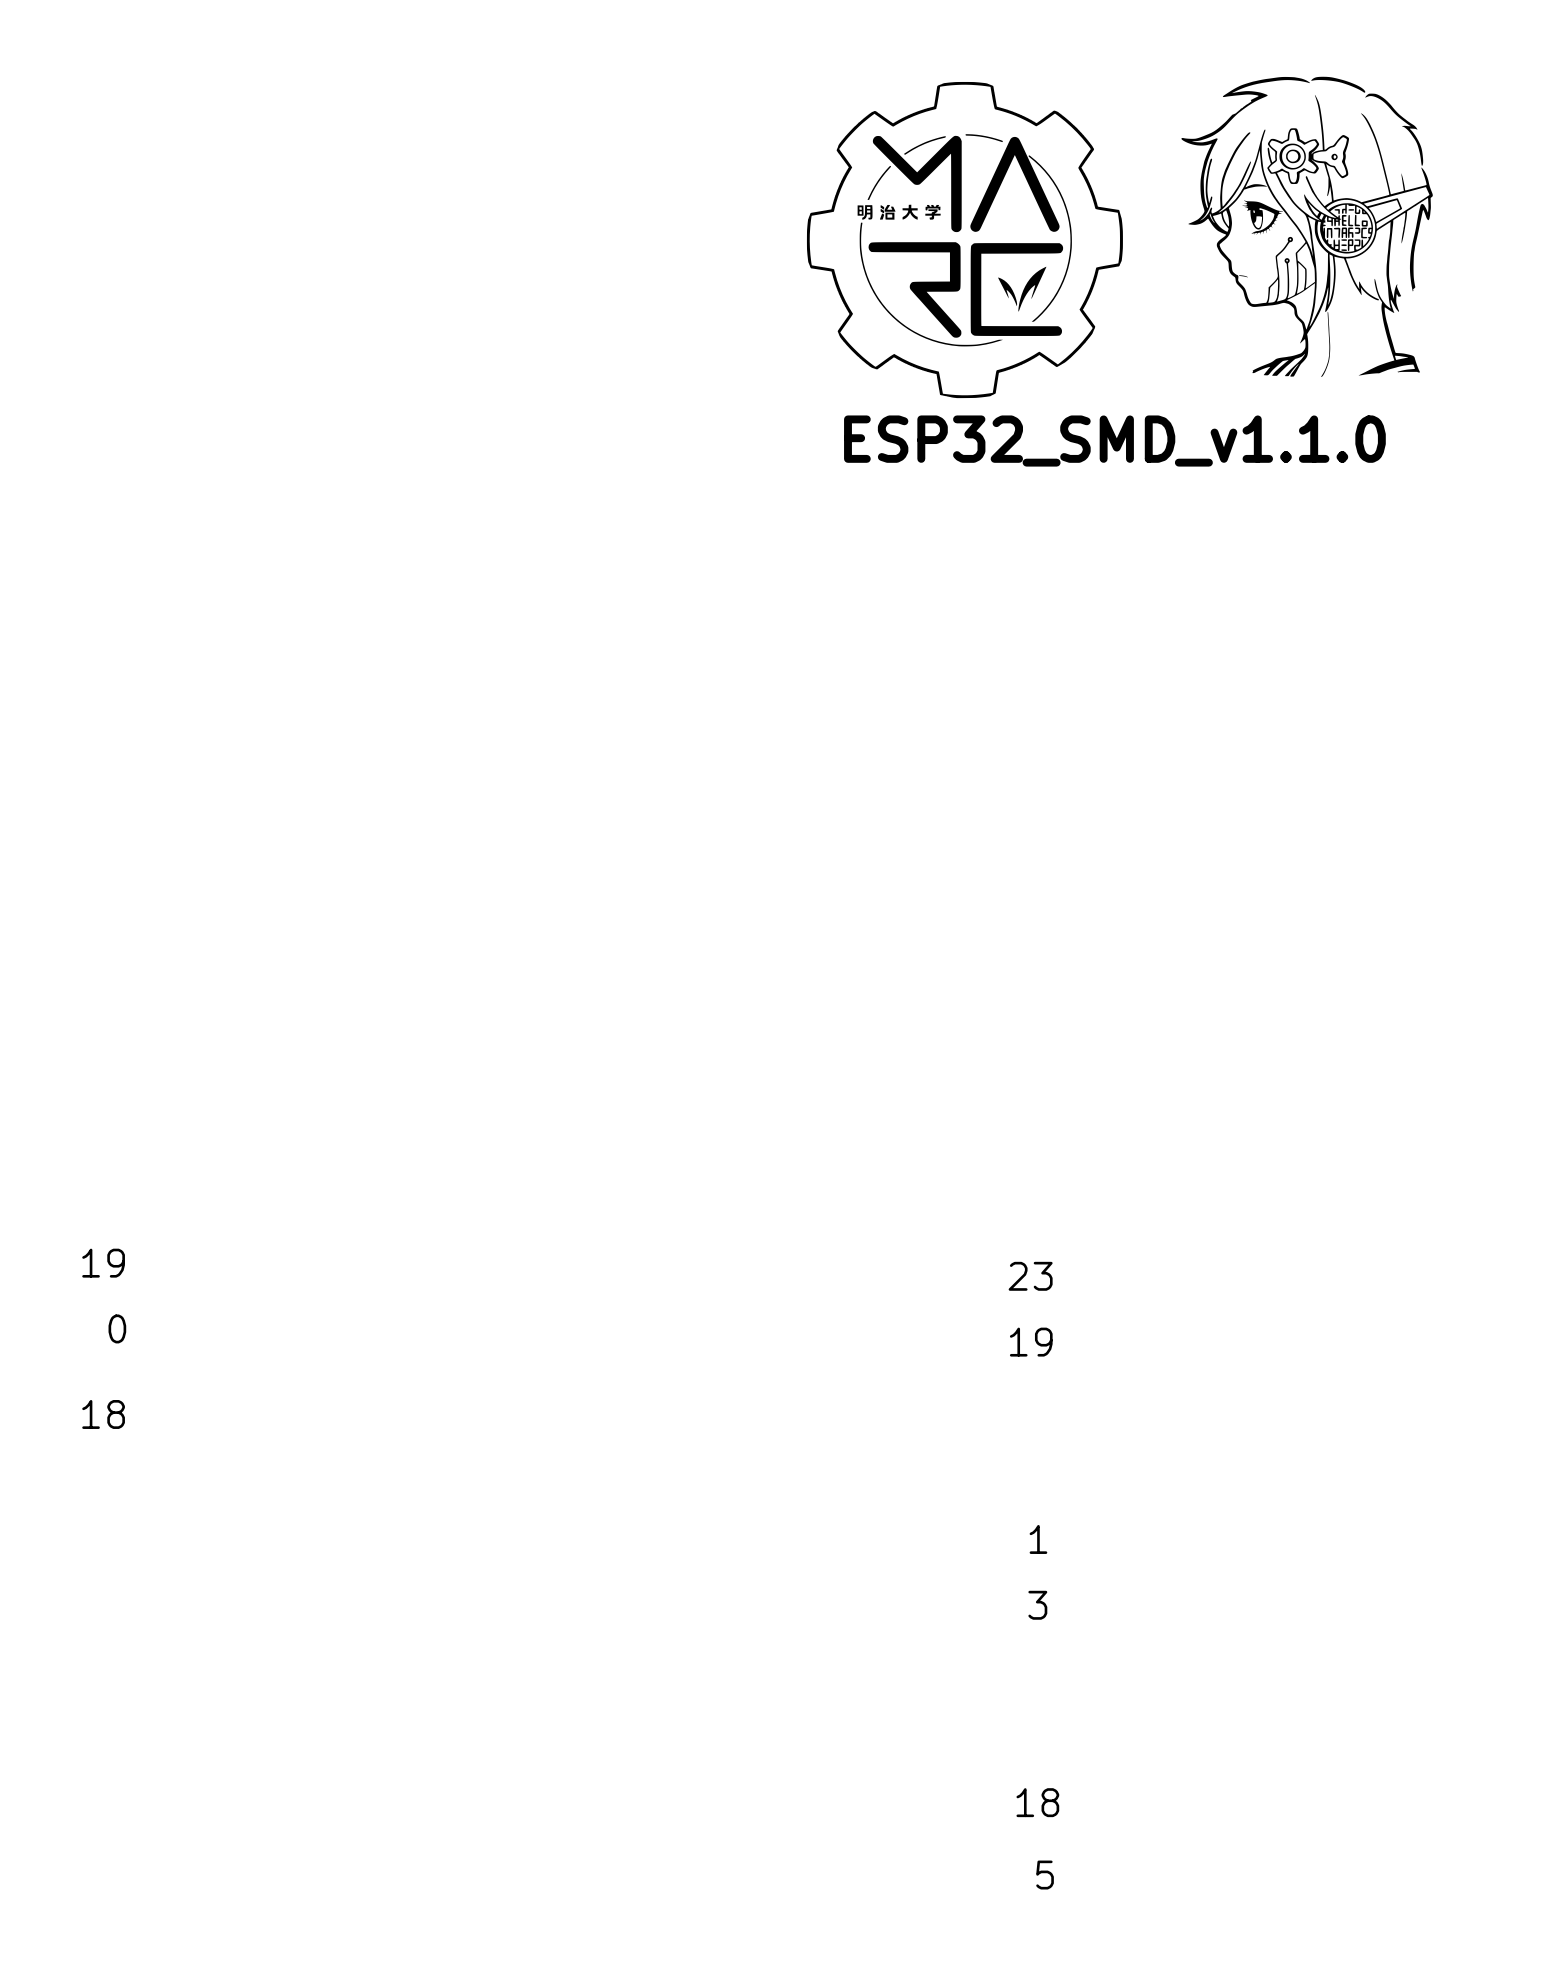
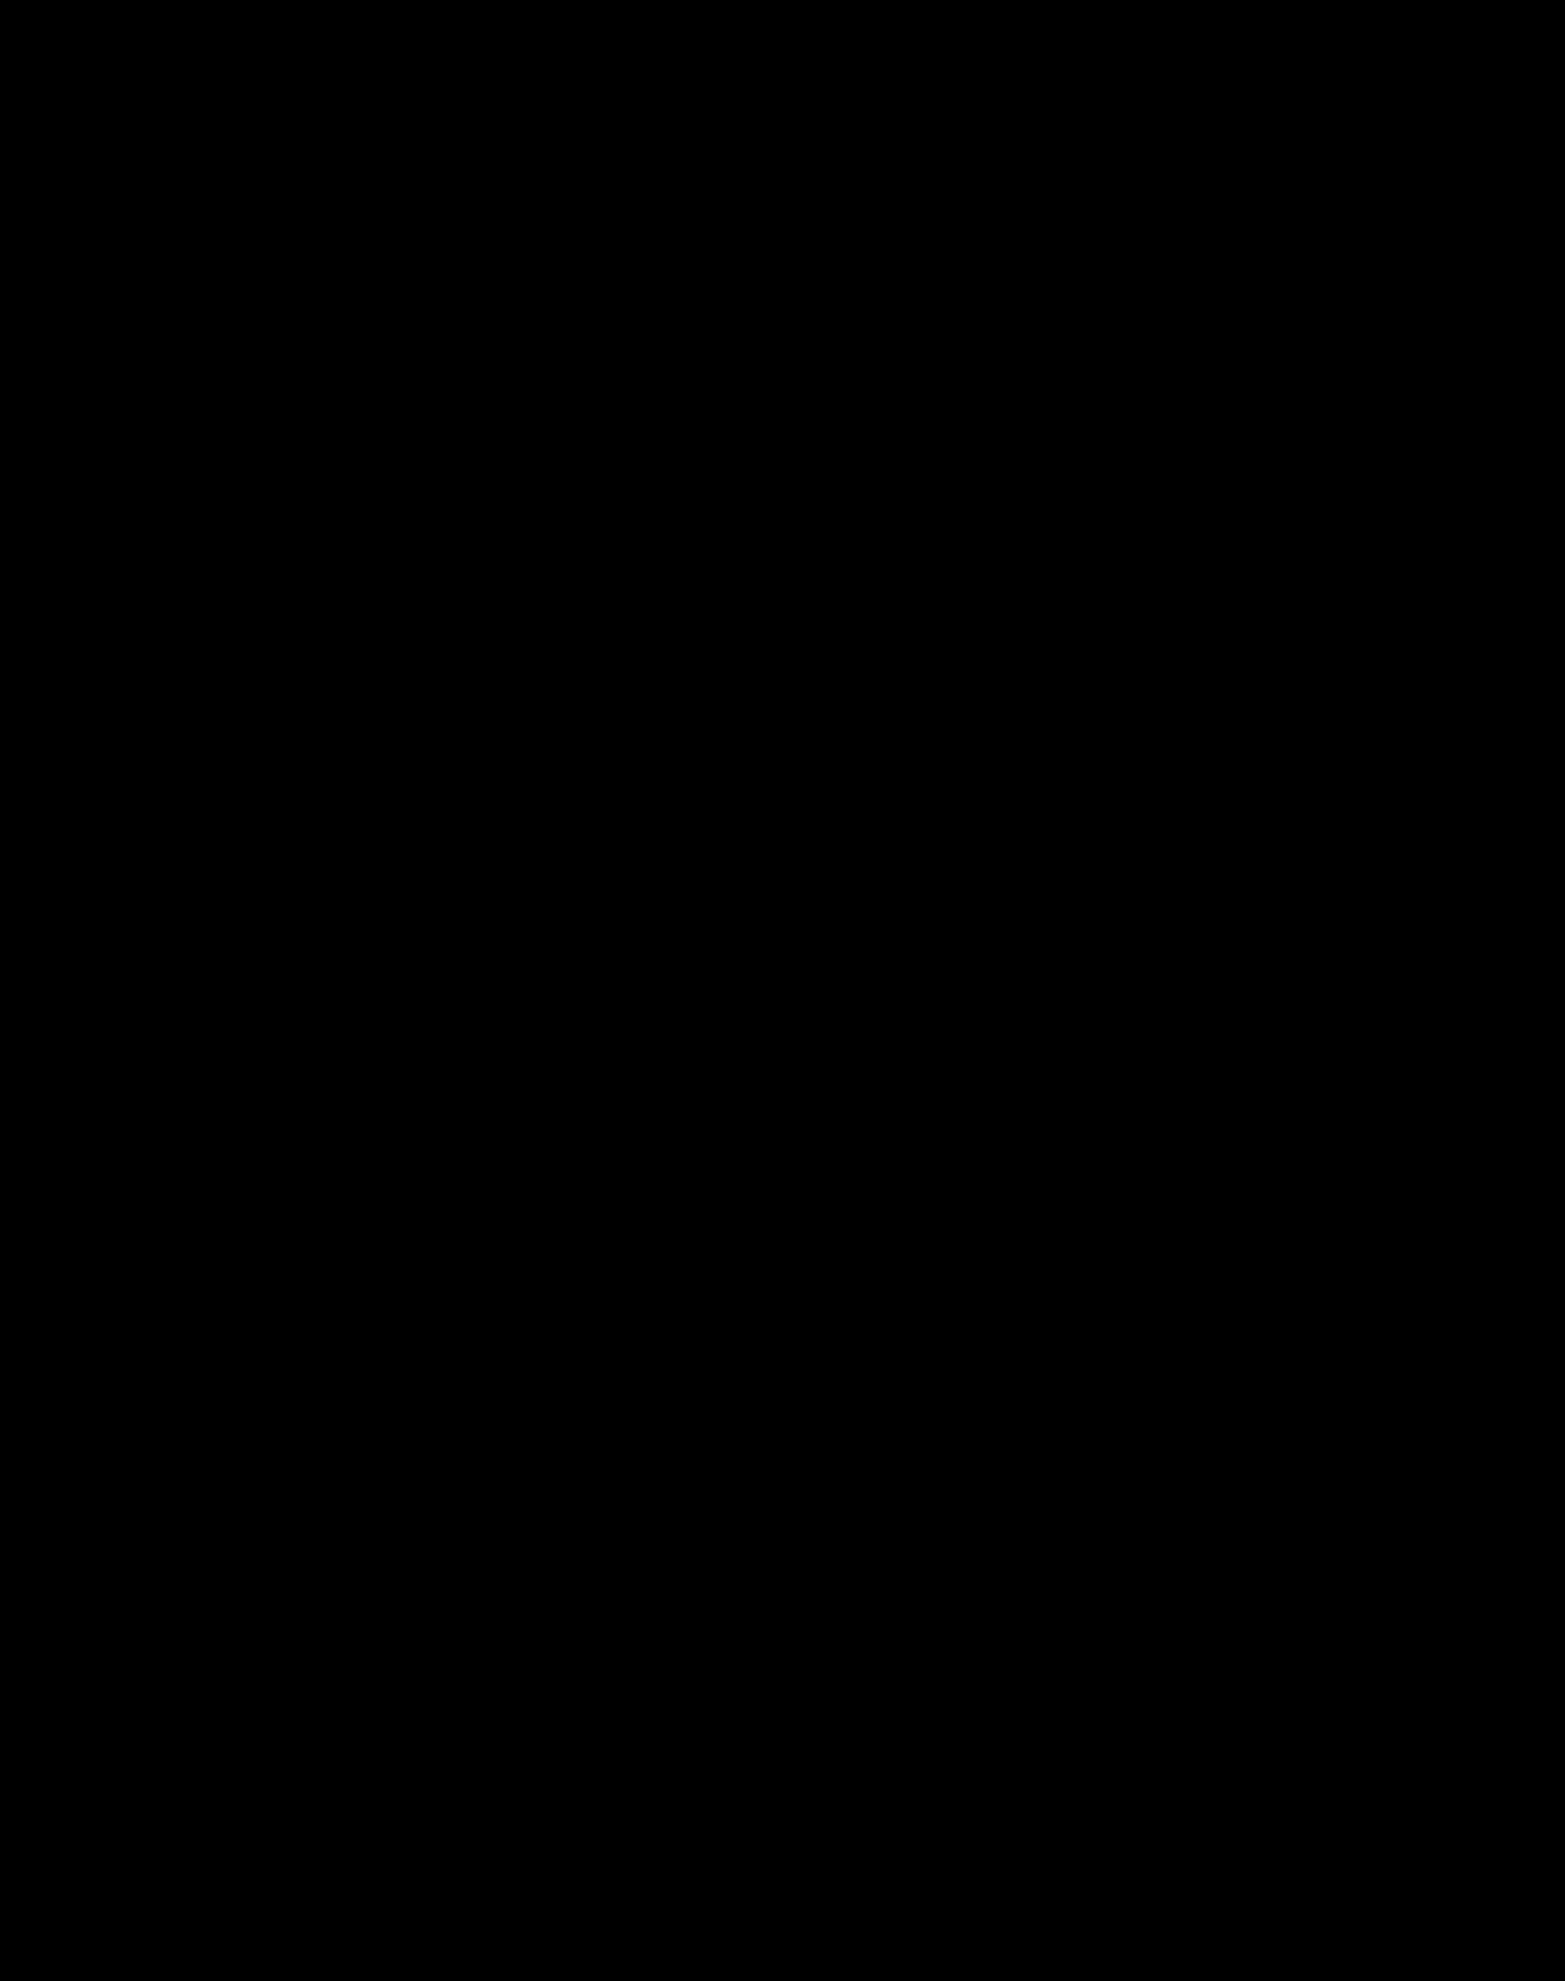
drawing: [1181, 76, 1433, 377] -> none
drawing: [806, 81, 1123, 399] -> none
text: ESP32_SMD_v1.1.0 (1114, 441) -> none
text: 19 (103, 1263) -> none
text: 23 (1030, 1276) -> none
text: 0 (117, 1328) -> none
text: 19 (1031, 1342) -> none
text: 18 (103, 1414) -> none
text: 1 (1038, 1539) -> none
text: 3 (1037, 1605) -> none
text: 18 (1037, 1802) -> none
text: 5 (1045, 1875) -> none

